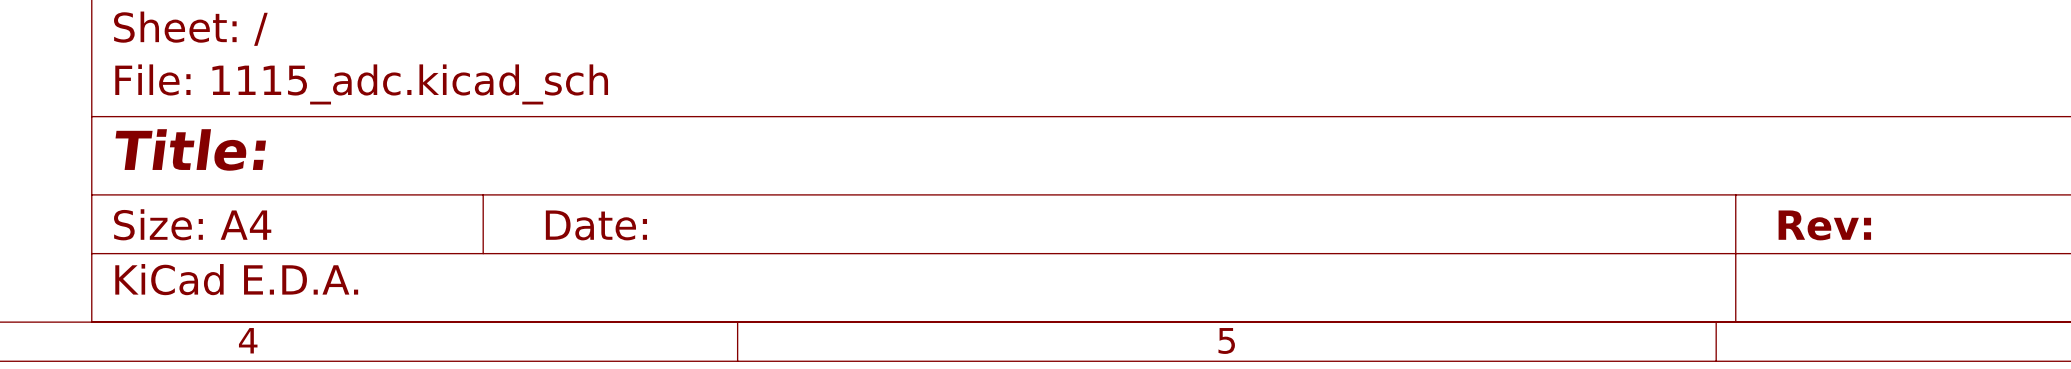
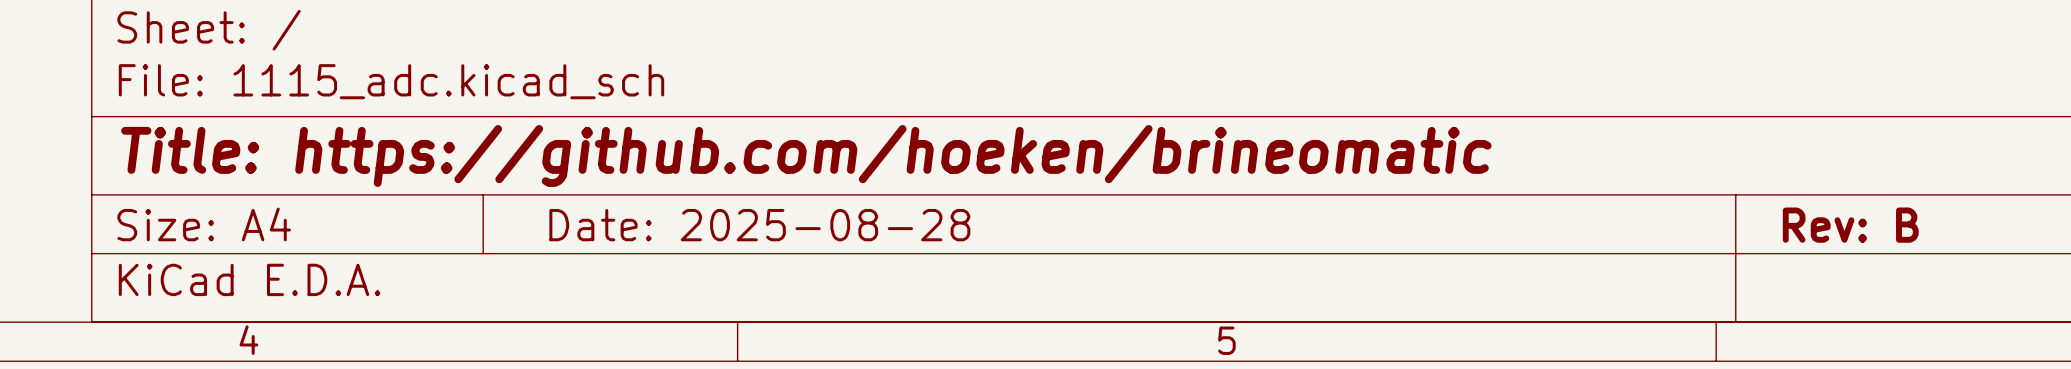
title block: Title: (190, 149) -> Title: https://github.com/hoeken/brineomatic (806, 155)
title block: Date: (596, 225) -> Date: 2025-08-28 (759, 225)
title block: Rev: (1824, 225) -> Rev: B (1850, 225)

